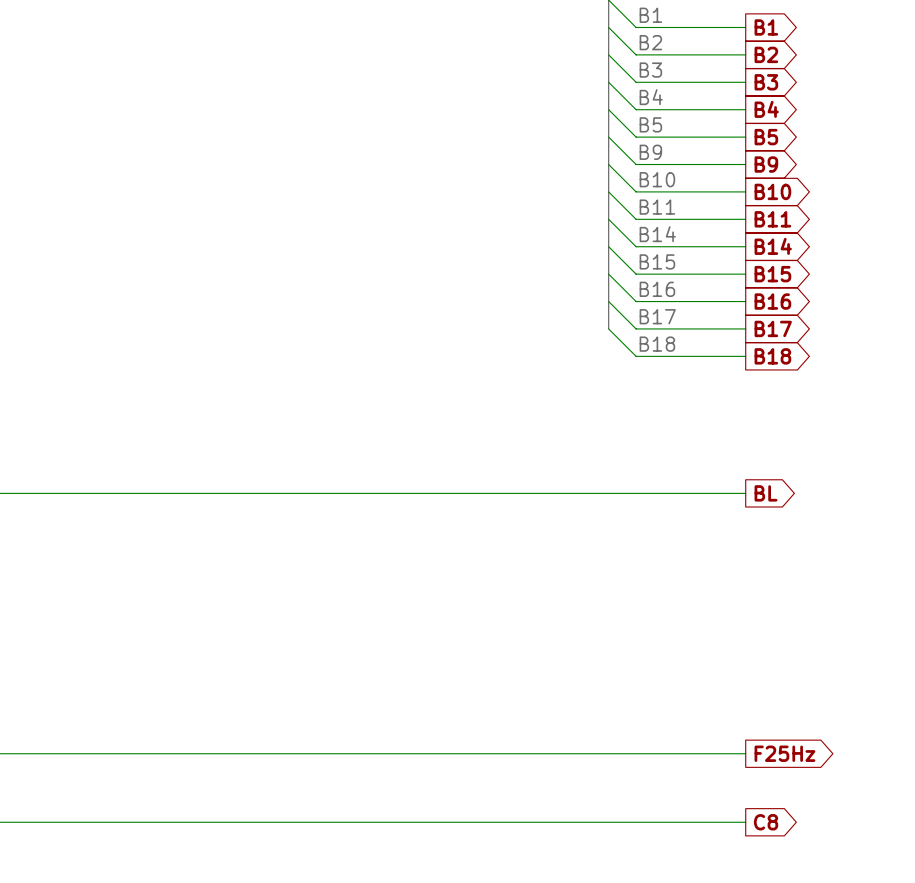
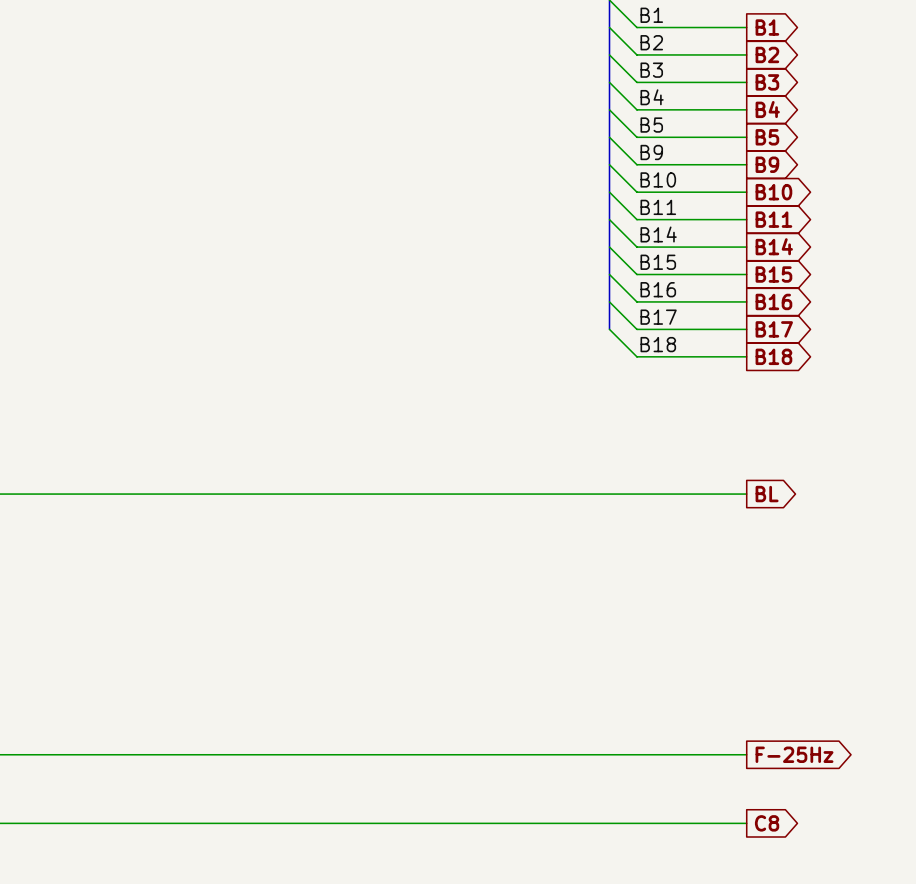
global label: F25Hz (784, 753) -> F-25Hz (794, 754)

